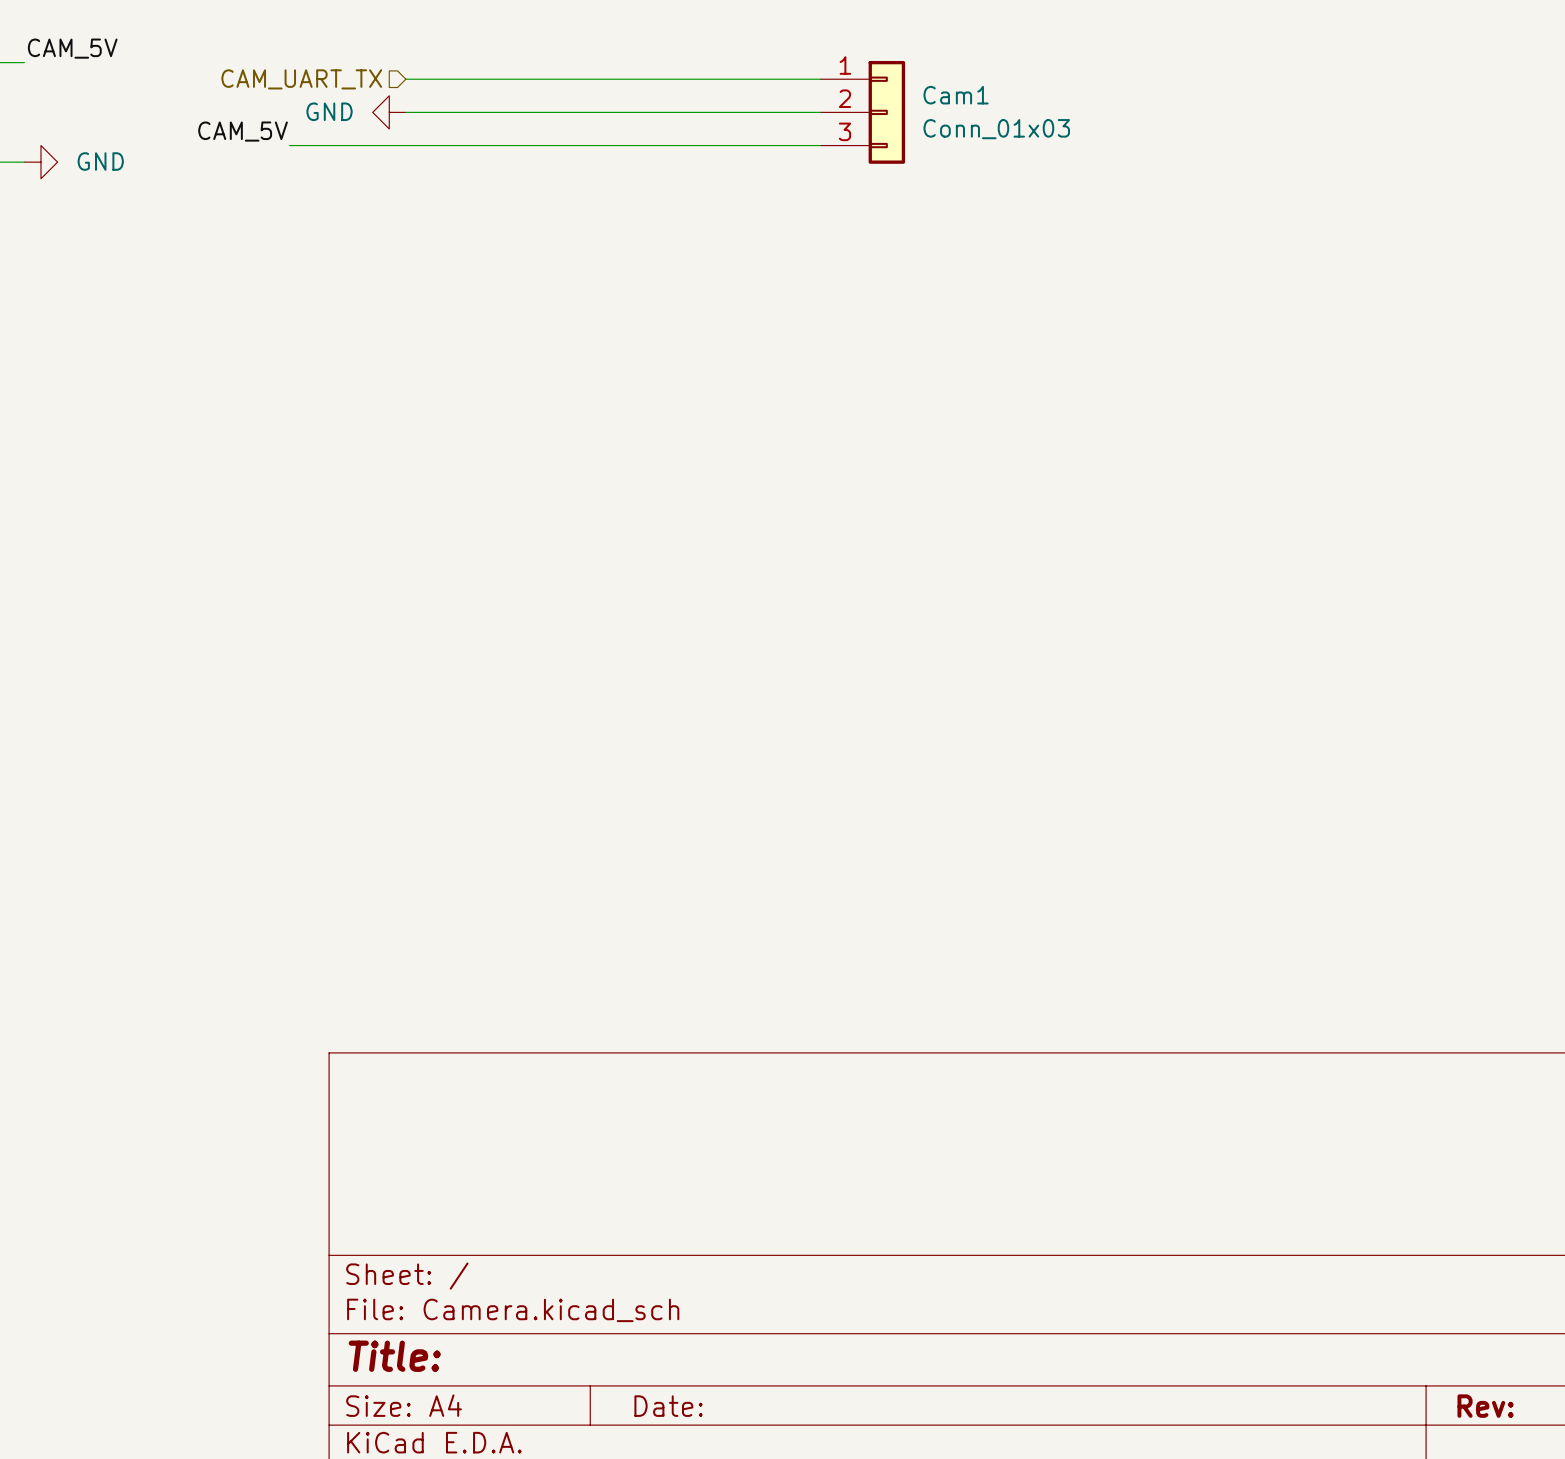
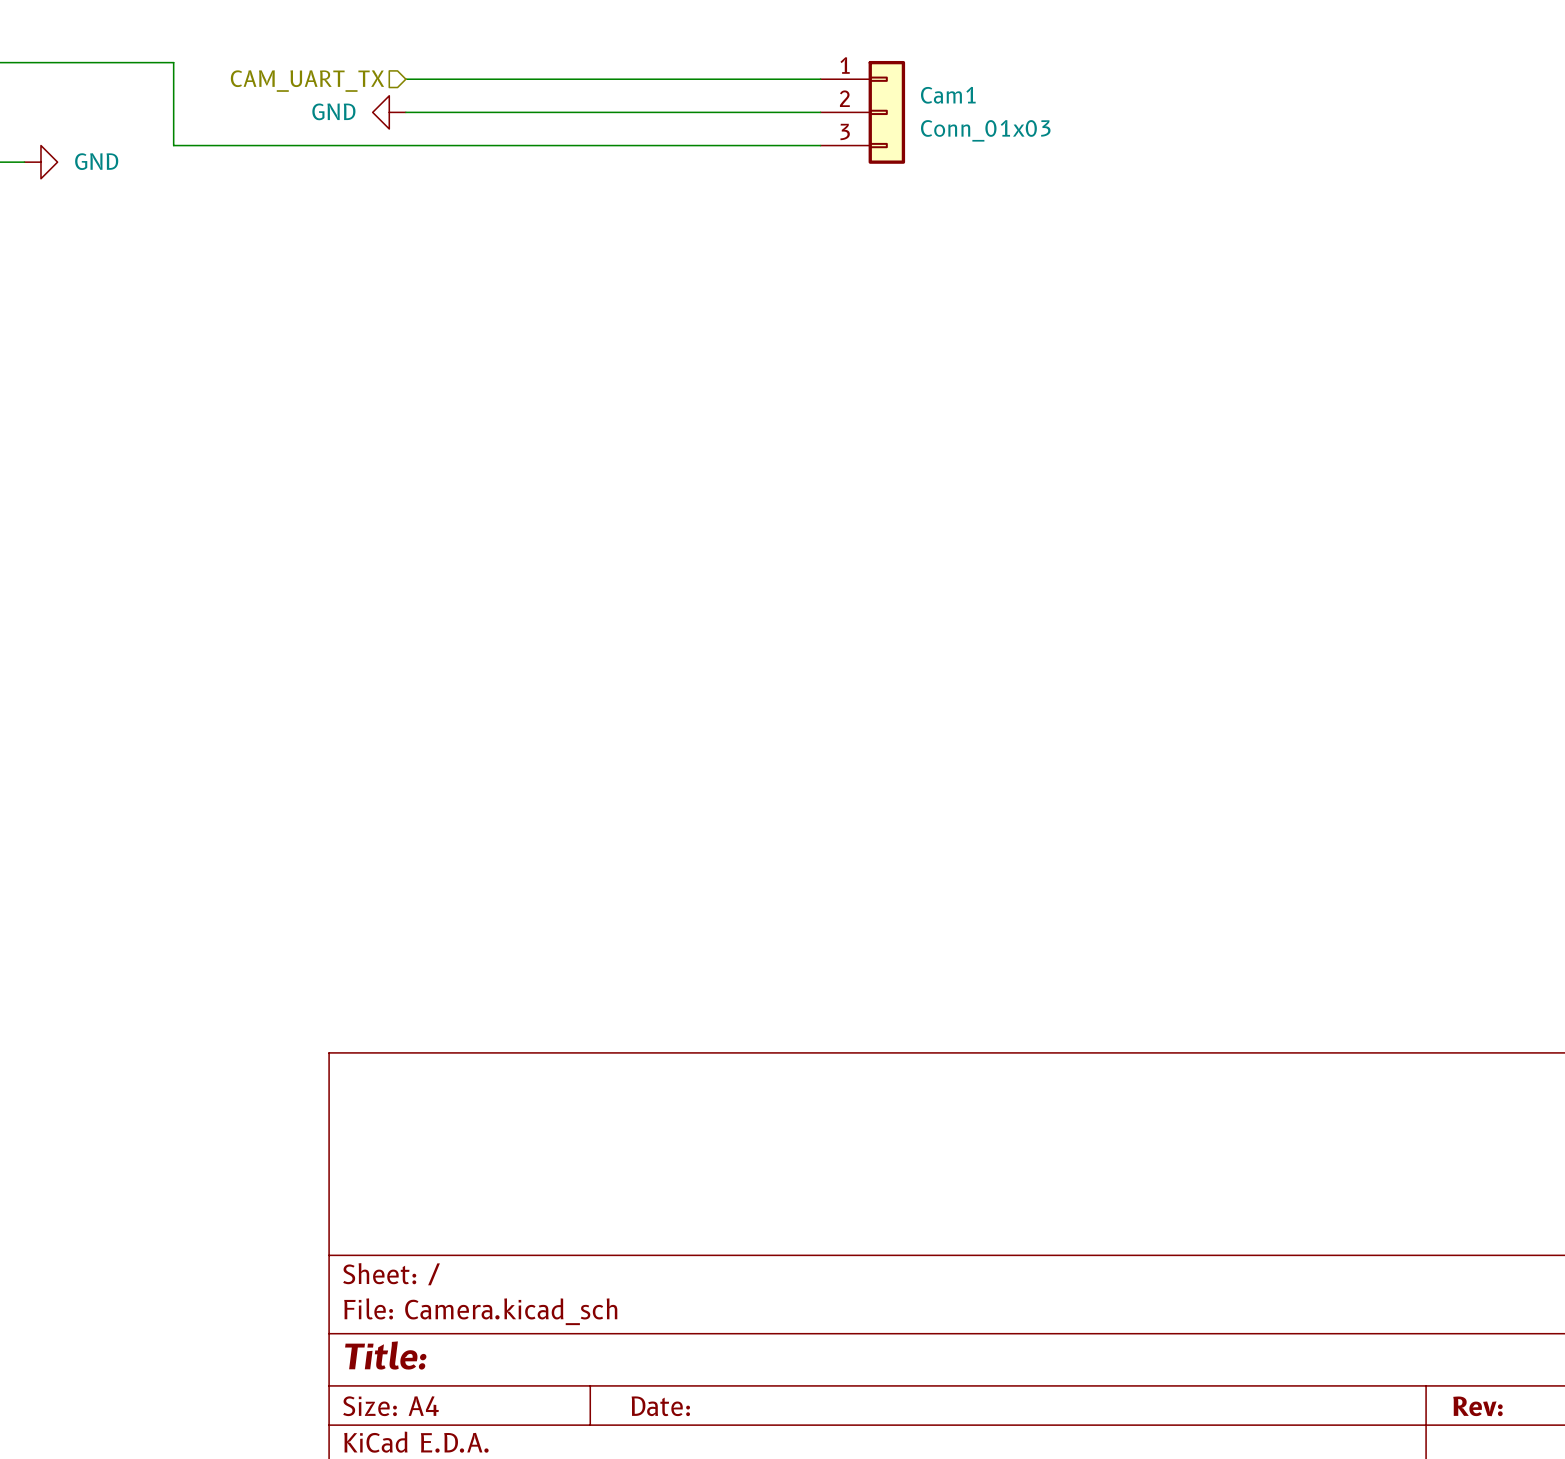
label: CAM_5V (72, 48) -> none
wire: none -> (24, 62) (173, 62) (173, 145) (289, 145)
label: CAM_5V (243, 131) -> none

